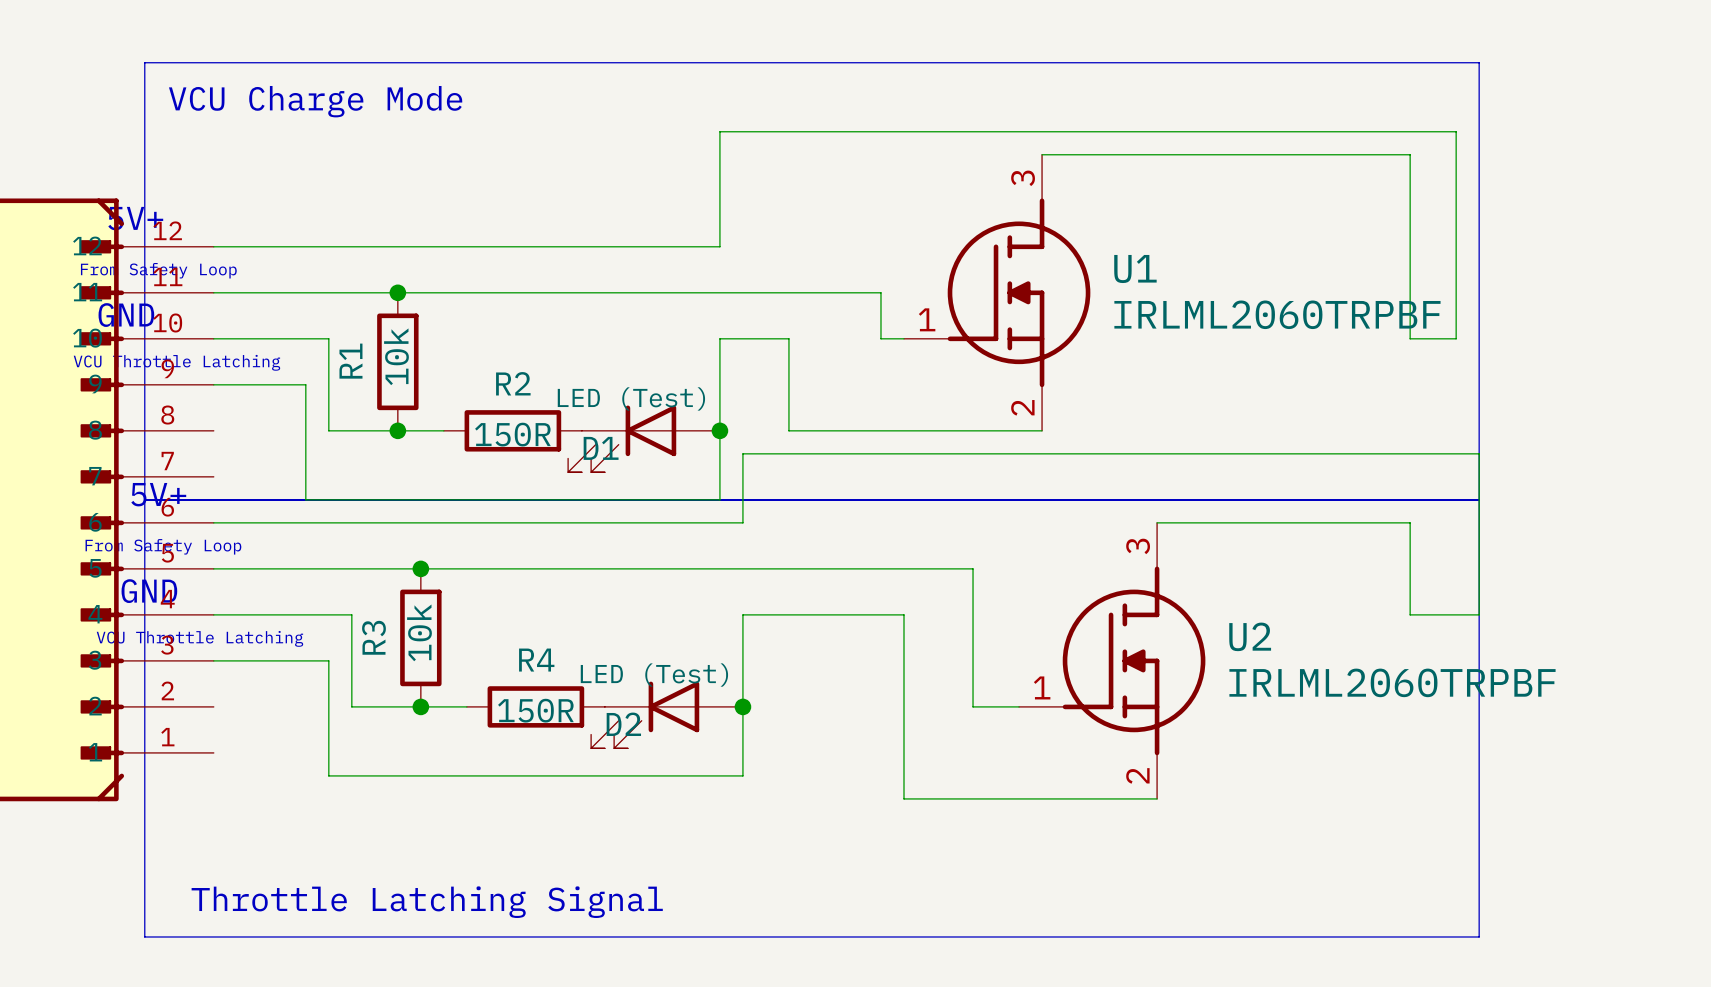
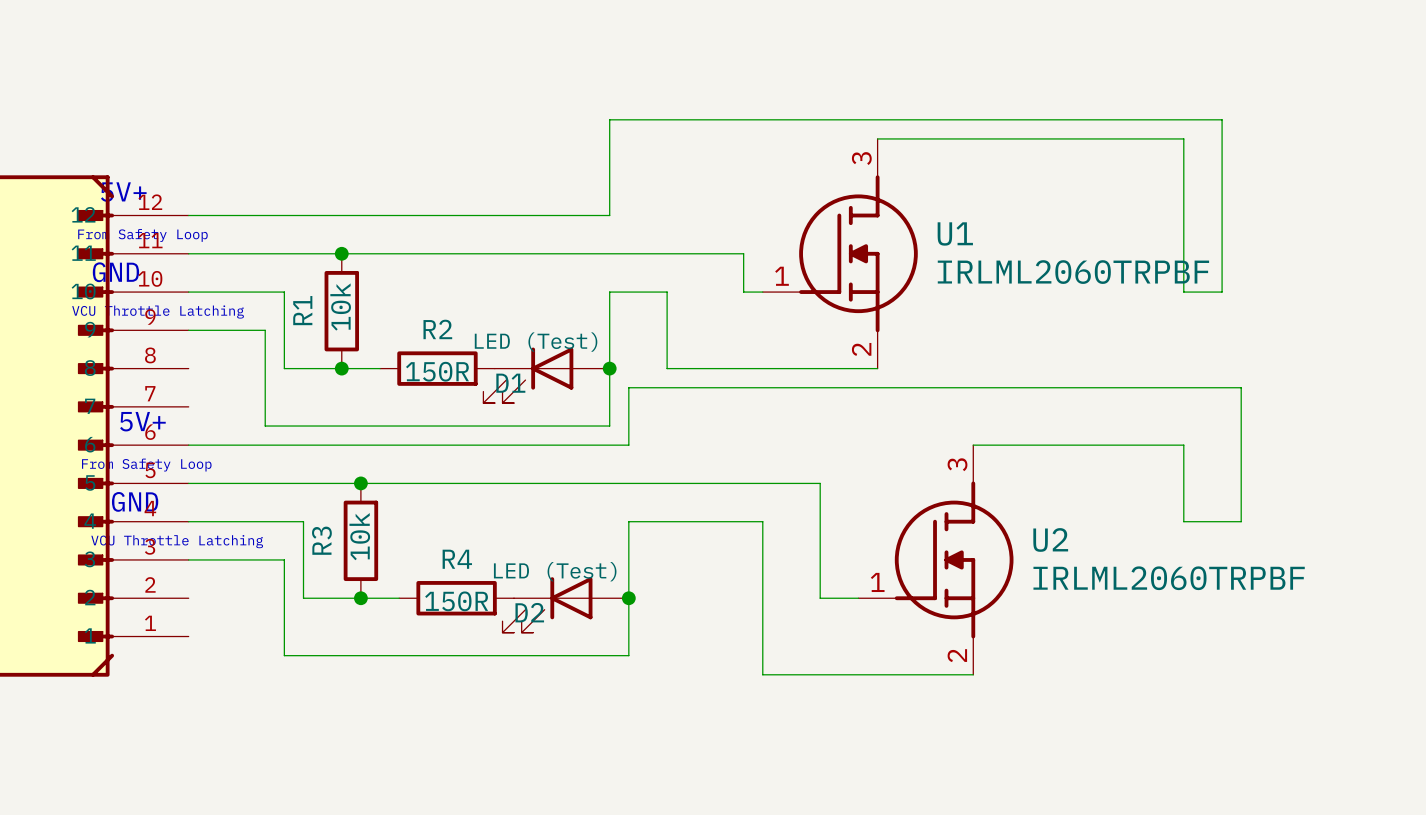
line: (144, 62) (1479, 62) (1479, 936) (144, 936) (144, 62) -> none
text: VCU Charge Mode (315, 101) -> none
line: (144, 499) (1479, 499) -> none
text: Throttle Latching Signal (427, 902) -> none

